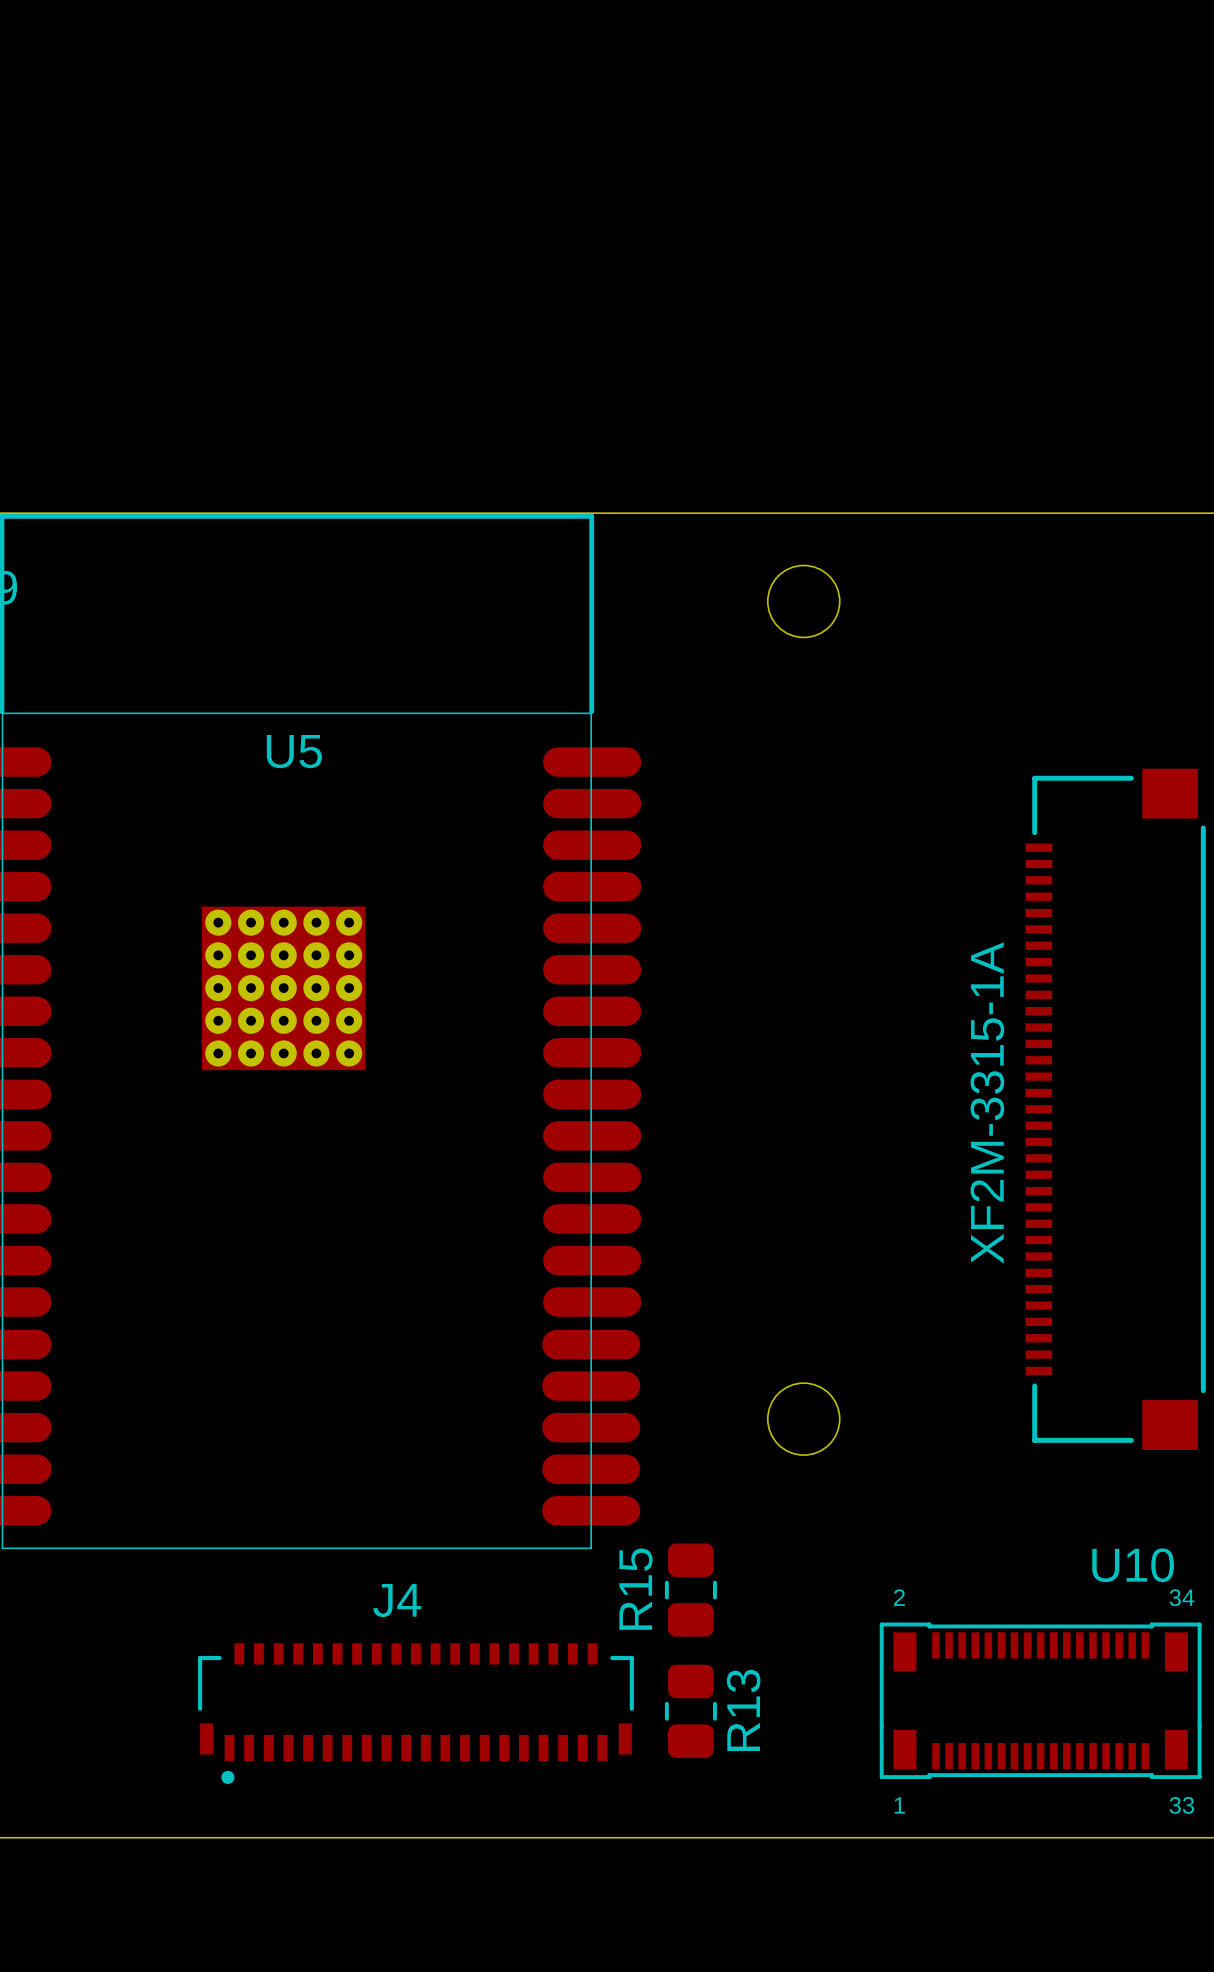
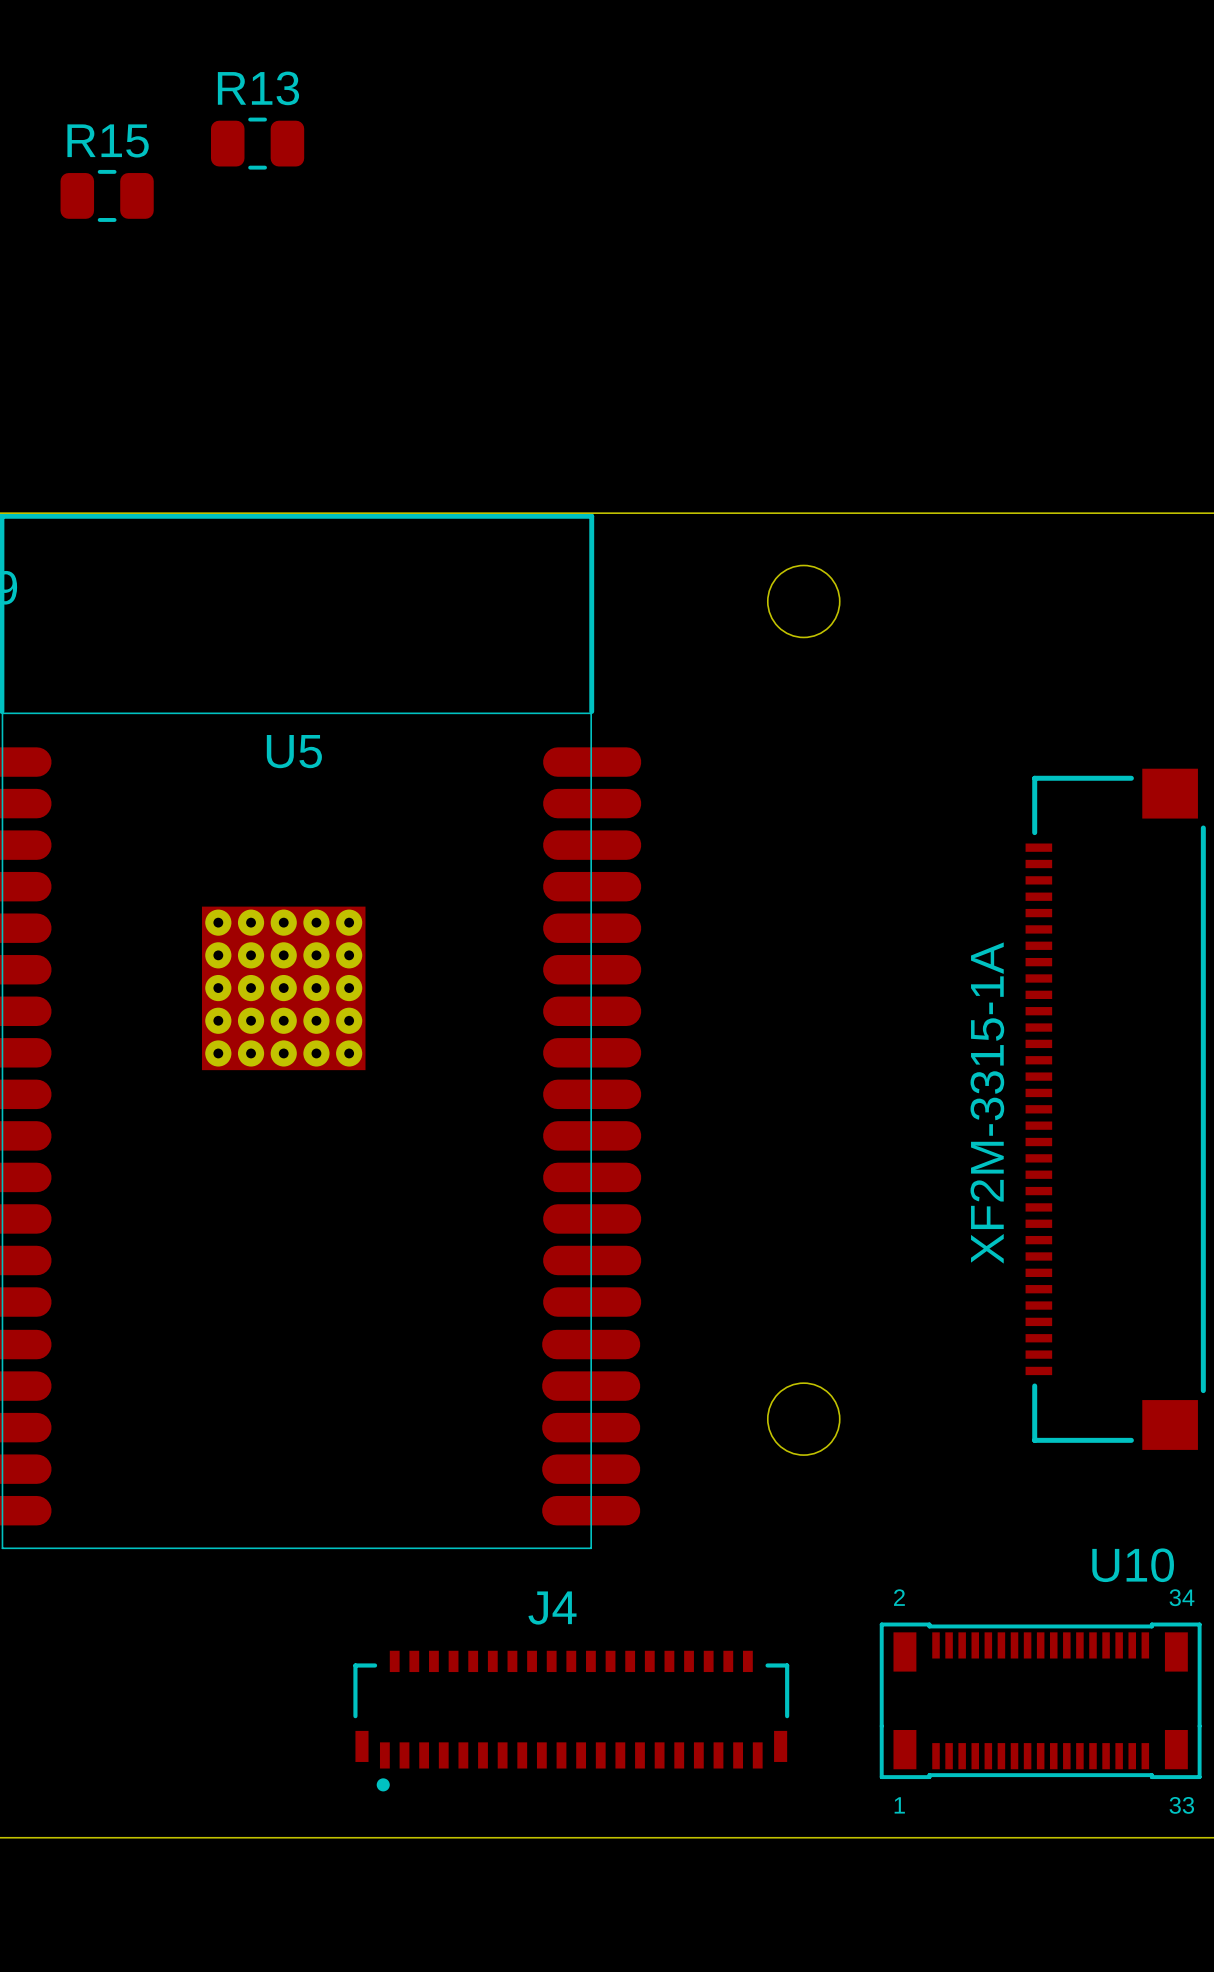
R15 rotation: 0° (690, 1590) -> 90° clockwise (107, 195)
R15 position: (690, 1590) -> (107, 195)
R13 name position: R13 (743, 1710) -> R13 (258, 88)
R13 rotation: 0° (690, 1711) -> 90° clockwise (257, 143)
R13 position: (690, 1711) -> (257, 143)
J4 position: (415, 1713) -> (571, 1721)

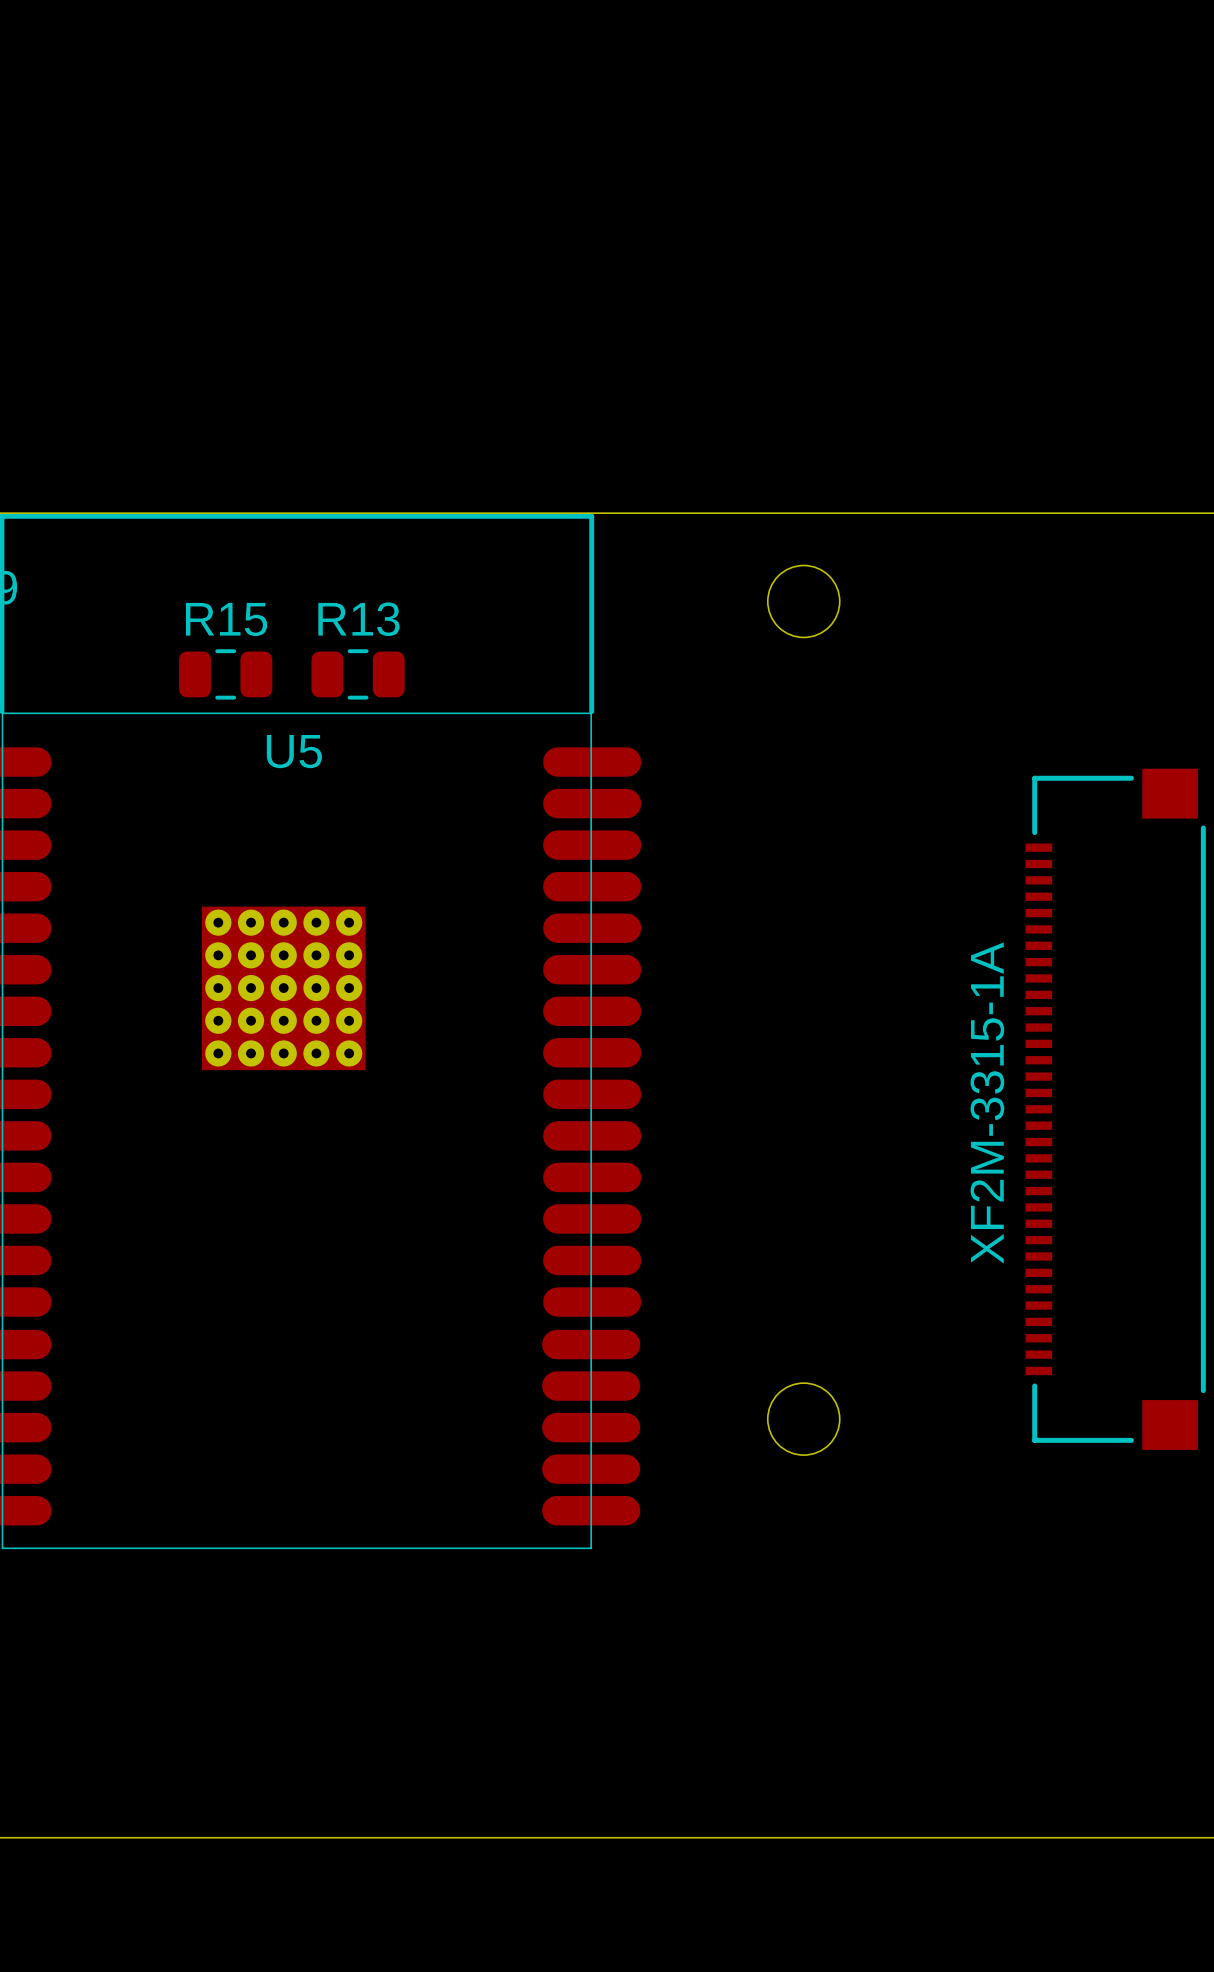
R13 footprint: [210, 117, 305, 170] -> [311, 649, 405, 700]
R15 footprint: [60, 169, 154, 222] -> [179, 649, 273, 700]
U10: (1040, 1700) -> none
J4: (571, 1721) -> none

